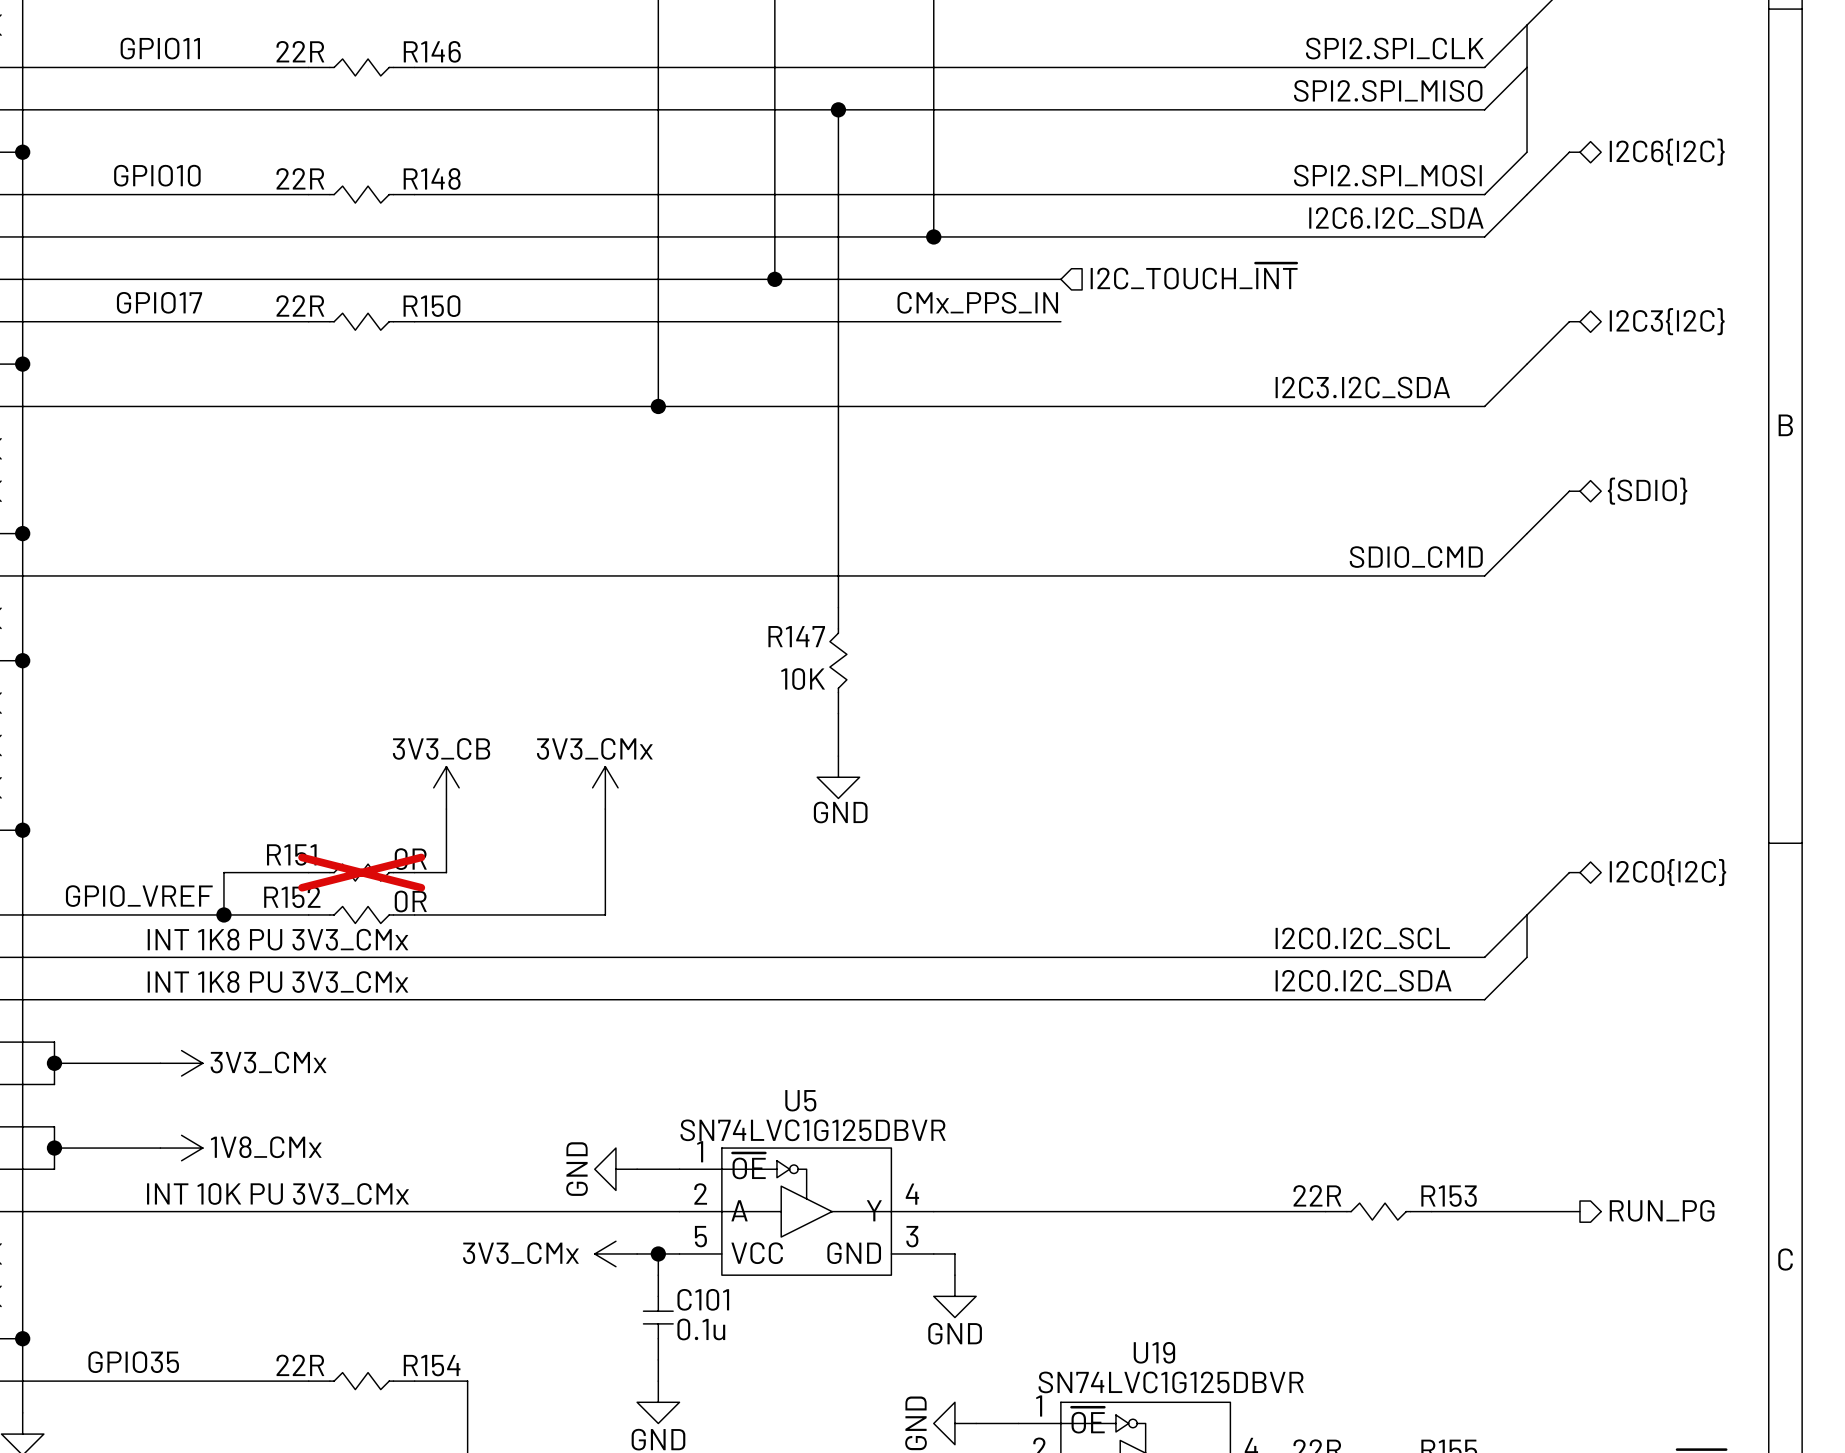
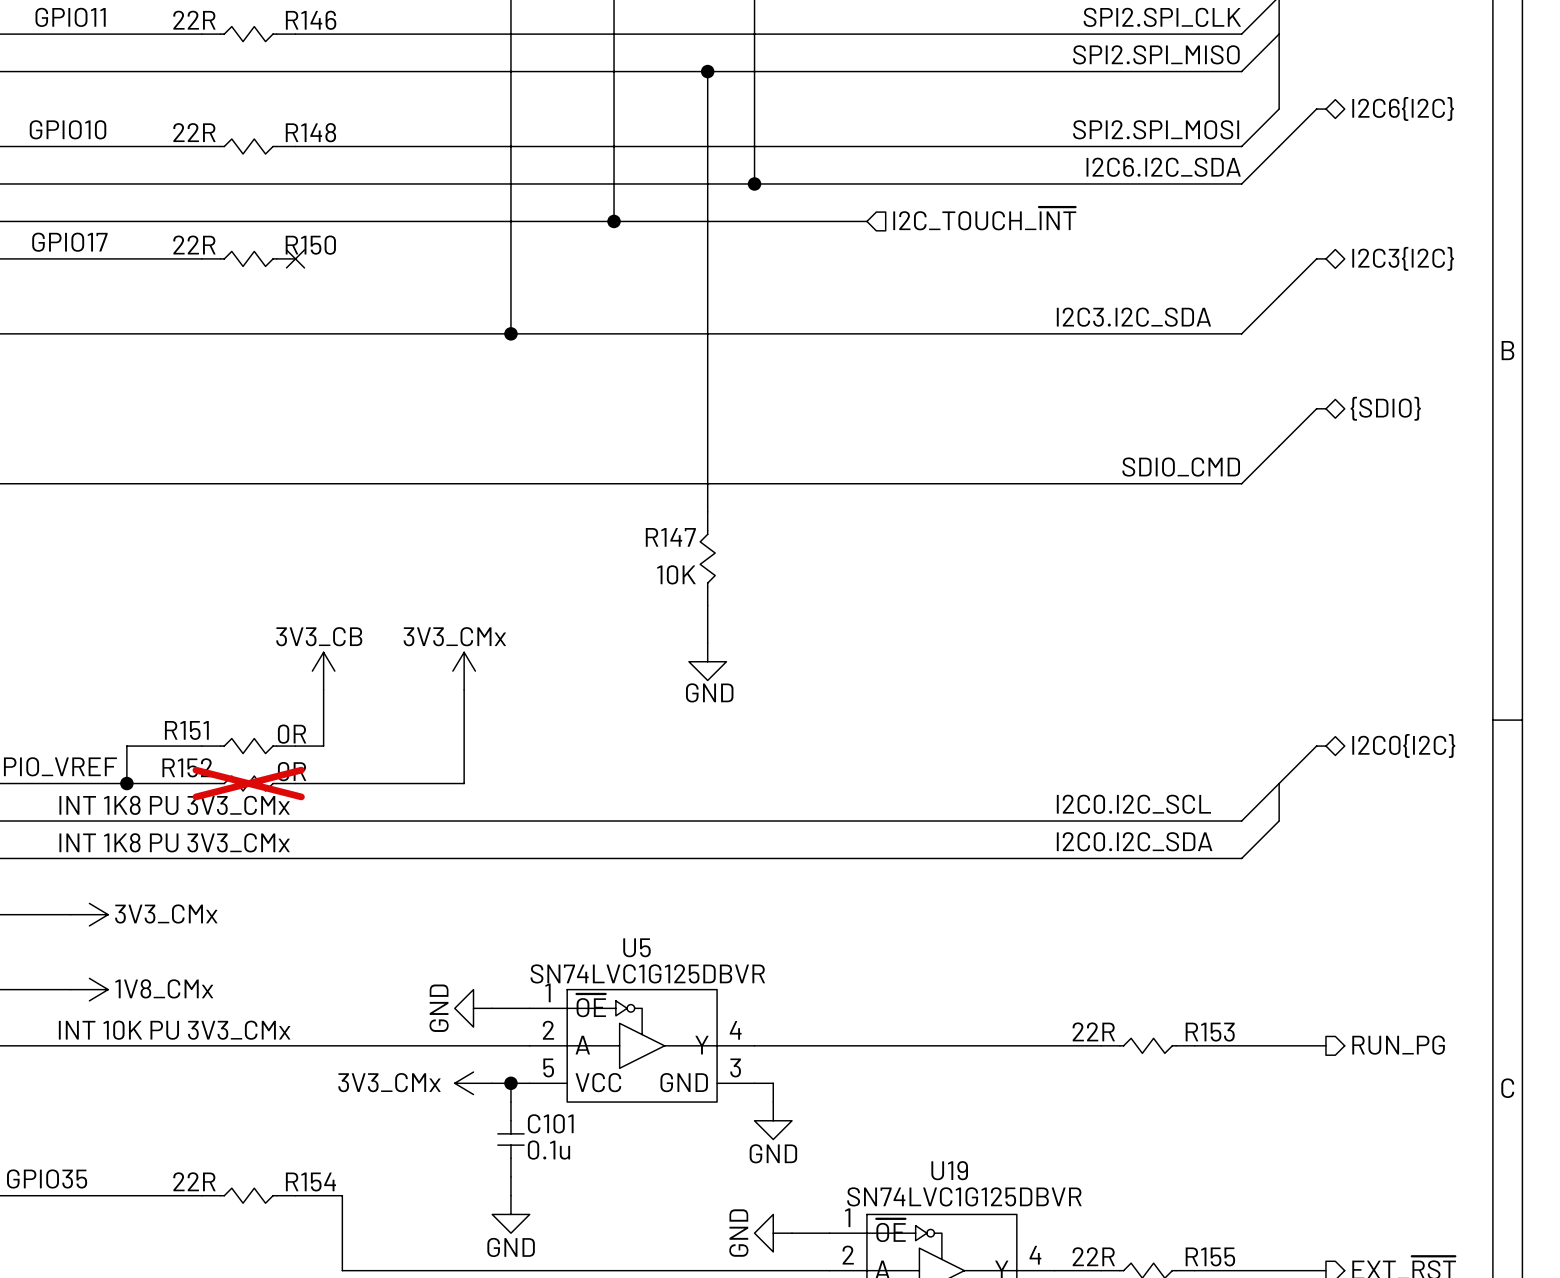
wire: (838, 109) (838, 607) -> (707, 71) (707, 511)
junction position: (838, 109) -> (707, 71)
label: CMx_PPS_IN (977, 302) -> none
wire: (414, 321) (1060, 321) -> none
no-connect mark: none -> (295, 258)
R147 position: (838, 660) -> (707, 558)
wire: (838, 713) (838, 756) -> (707, 605) (707, 643)
power symbol position: GND (838, 777) -> GND (707, 661)
R151 do-not-place cross: (361, 872) -> none
R152 do-not-place cross: none -> (248, 783)

